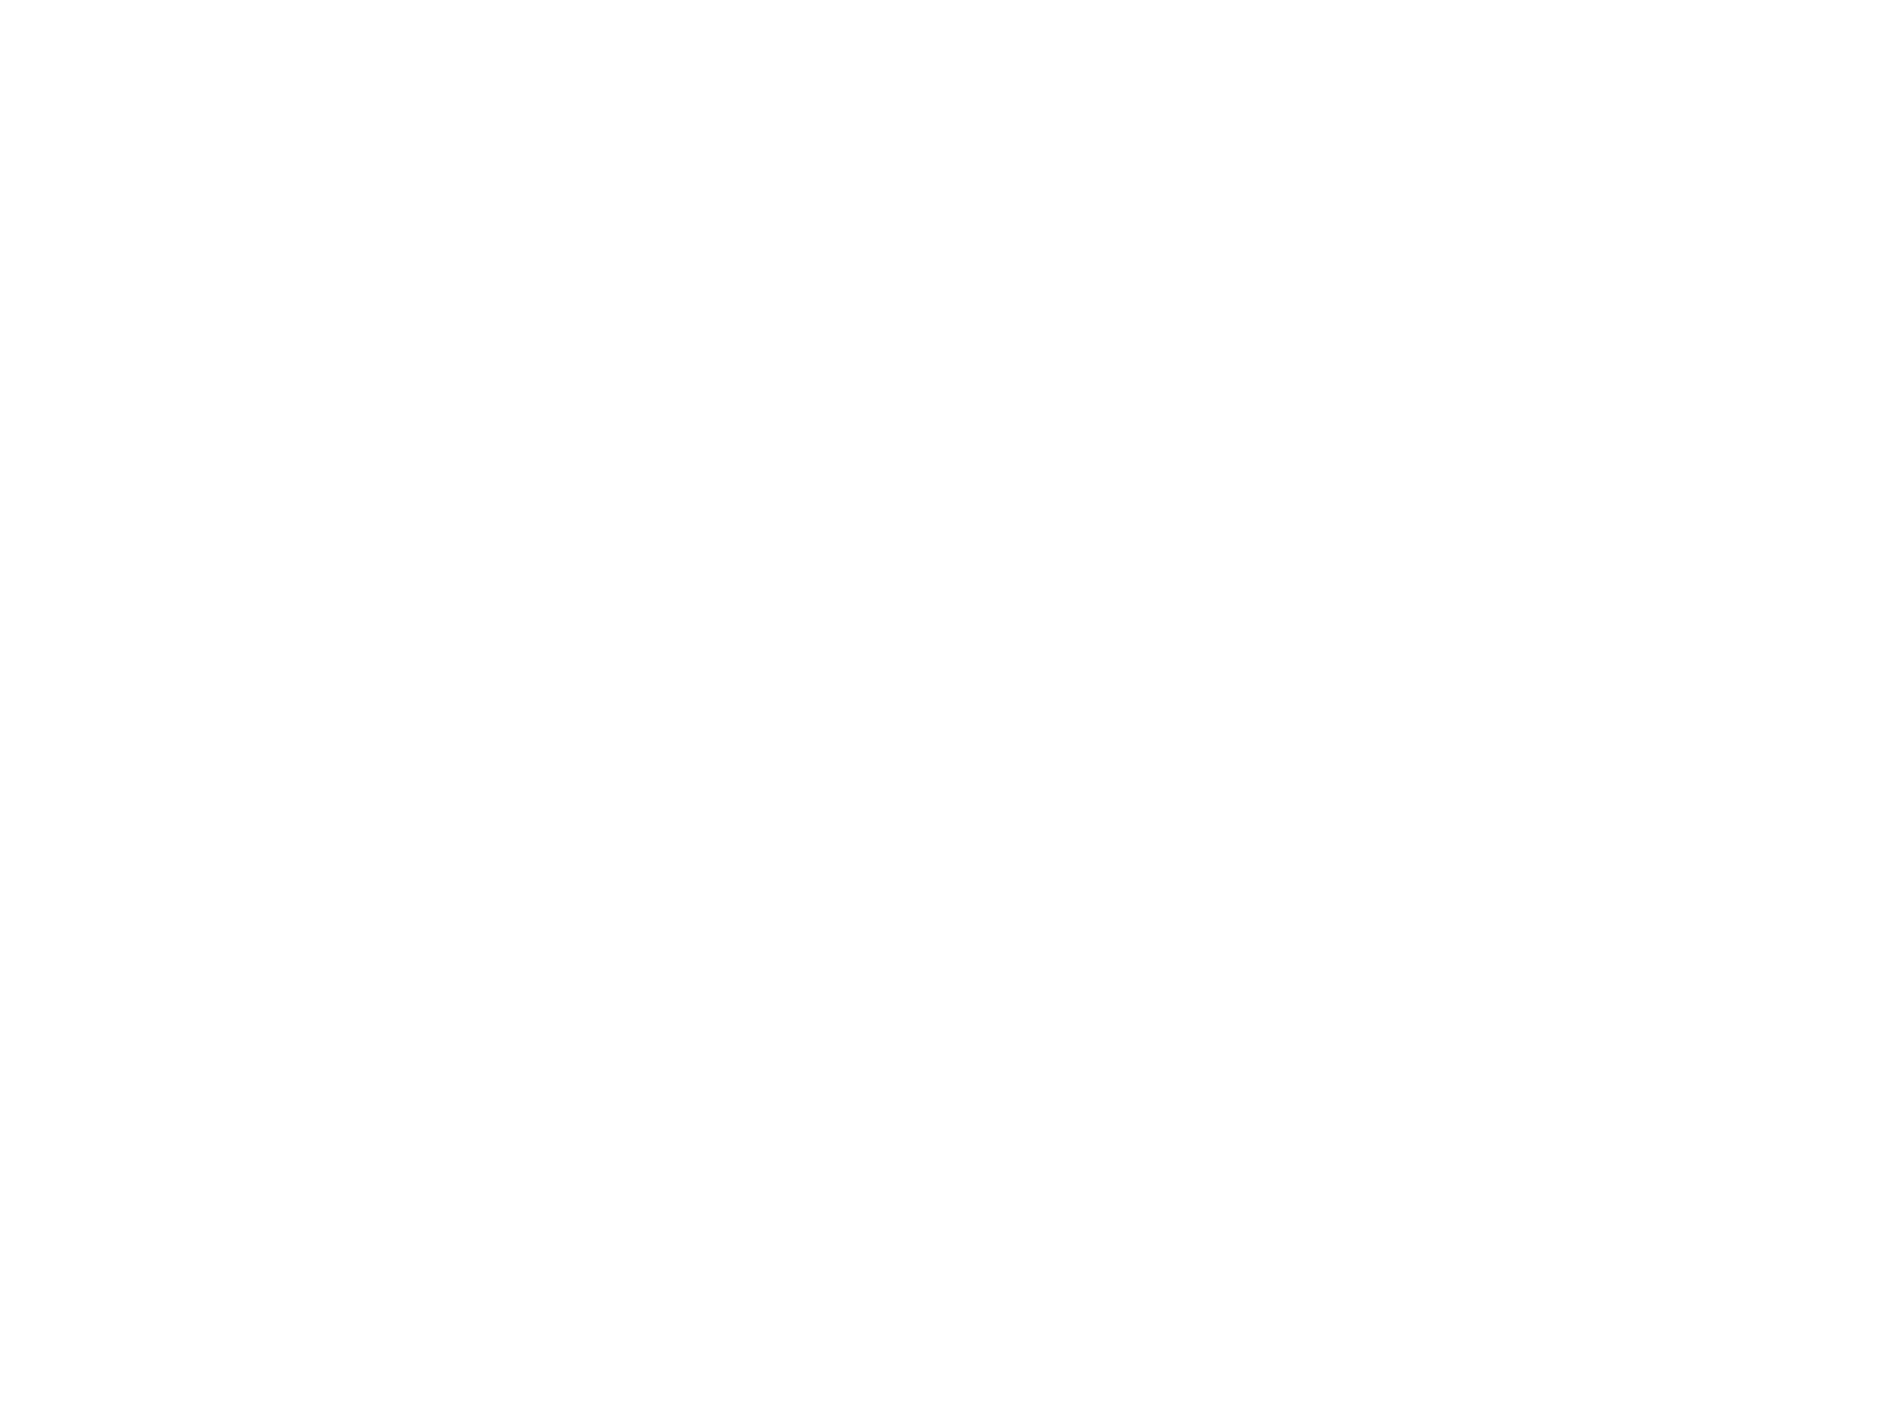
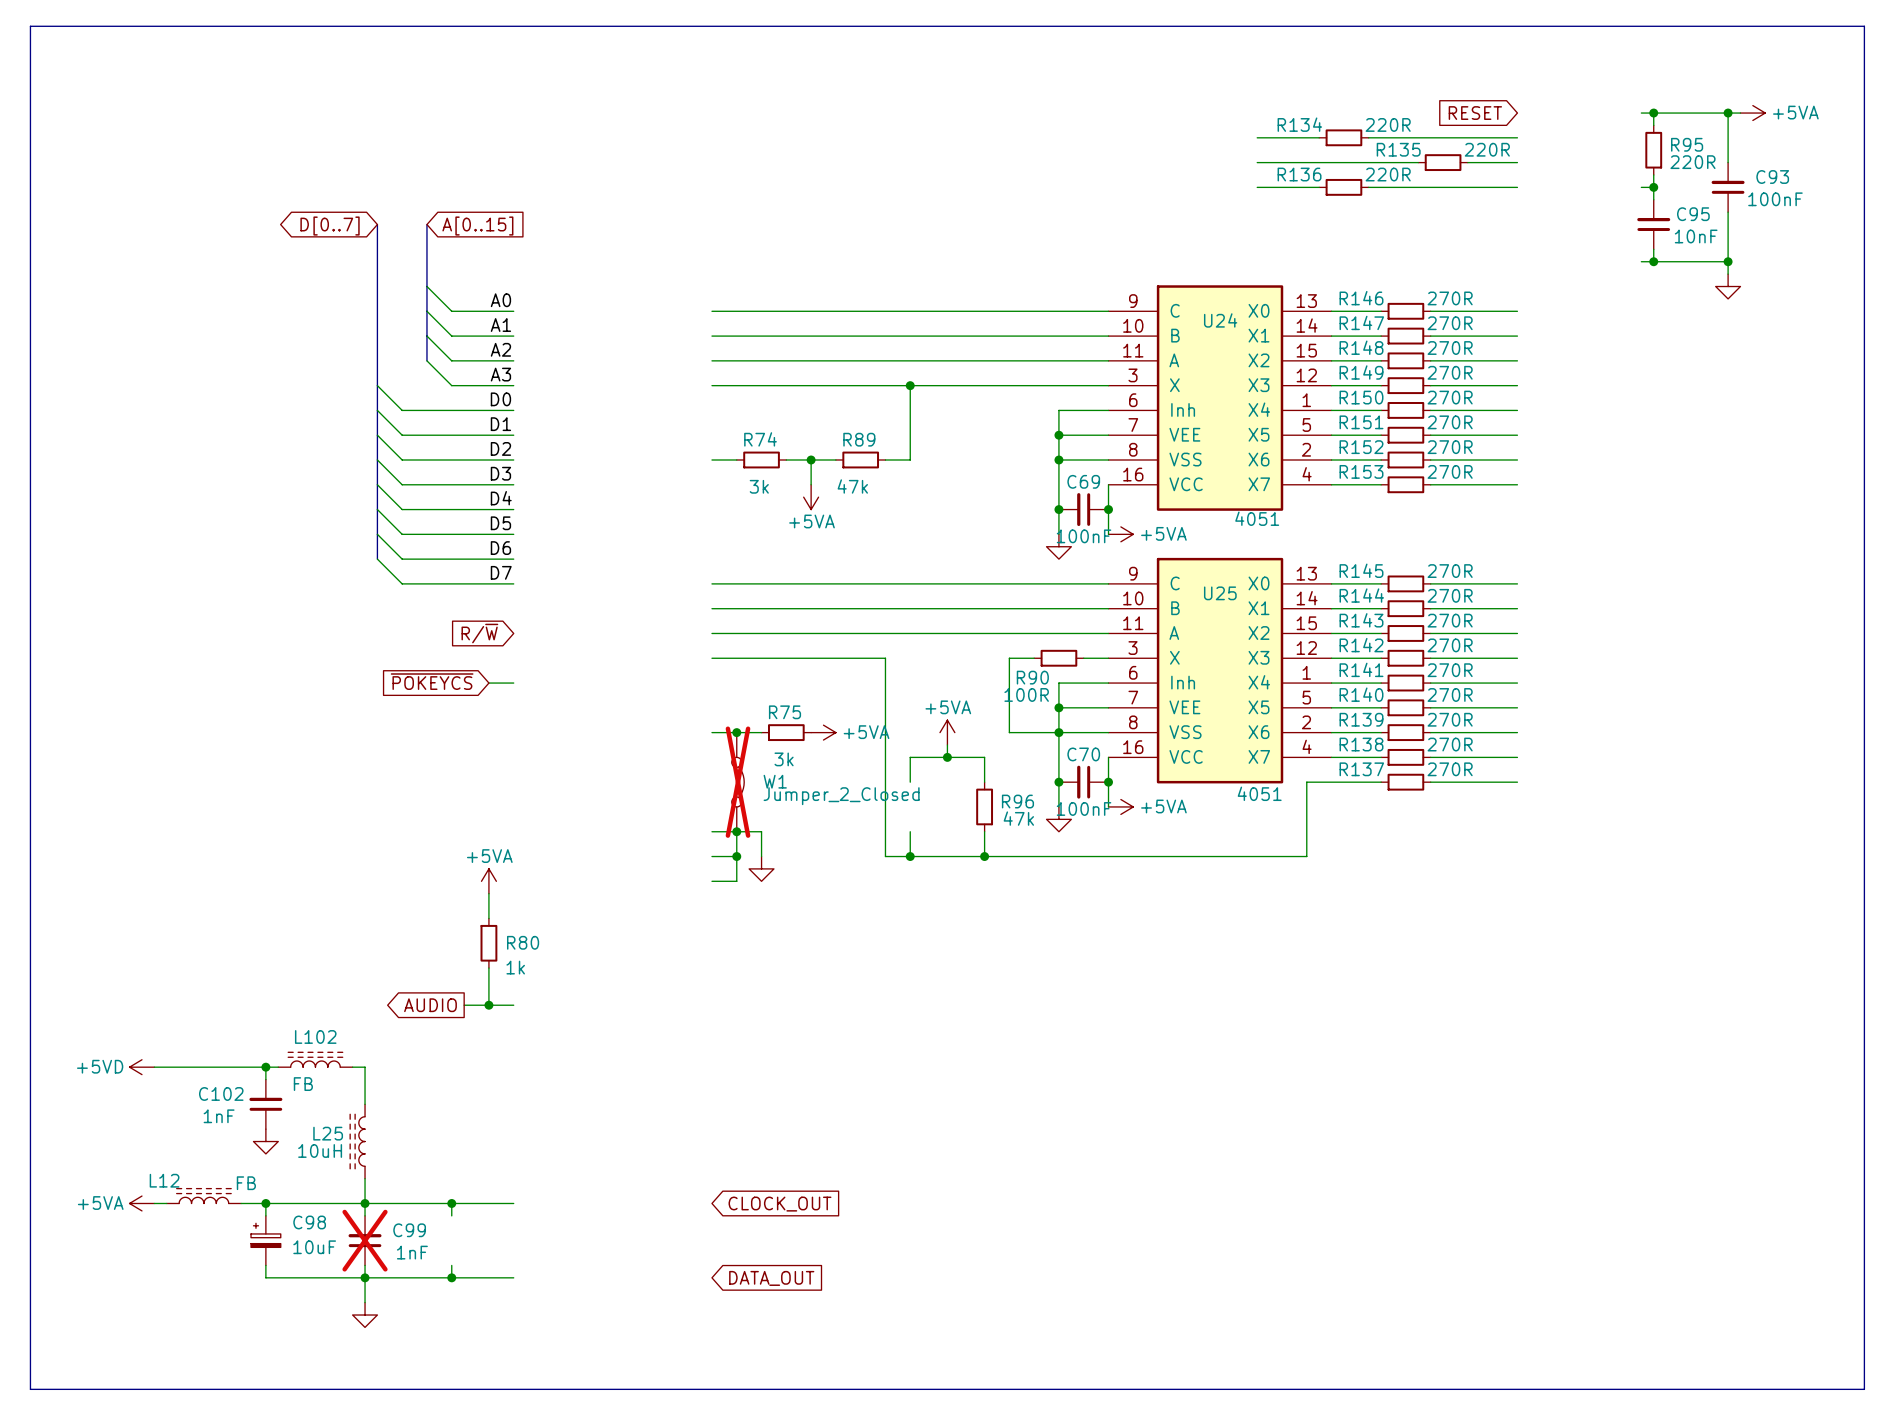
line: none -> (30, 26) (1864, 26) (1864, 1389) (30, 1389) (30, 26)
global label: none -> RESET (1475, 113)
wire: none -> (1641, 113) (1740, 113)
wire: none -> (1653, 113) (1653, 125)
junction: none -> (1653, 113)
wire: none -> (1728, 113) (1728, 162)
junction: none -> (1728, 113)
power symbol: none -> +5VA (1752, 113)
wire: none -> (1257, 137) (1319, 137)
R134: none -> 220R (1343, 137)
wire: none -> (1368, 137) (1517, 137)
R95: none -> 220R (1653, 150)
wire: none -> (1257, 162) (1418, 162)
R135: none -> 220R (1443, 162)
wire: none -> (1467, 162) (1517, 162)
wire: none -> (1653, 174) (1653, 199)
wire: none -> (1257, 187) (1319, 187)
R136: none -> 220R (1343, 187)
wire: none -> (1368, 187) (1517, 187)
wire: none -> (1641, 187) (1653, 187)
junction: none -> (1653, 187)
C93: none -> 100nF (1728, 187)
wire: none -> (1728, 212) (1728, 274)
bus: none -> (377, 224) (377, 559)
bus: none -> (426, 224) (426, 360)
C95: none -> 10nF (1653, 224)
global label: none -> D[0..7] (330, 226)
global label: none -> A[0..15] (477, 226)
wire: none -> (1653, 249) (1653, 261)
wire: none -> (1641, 261) (1728, 261)
junction: none -> (1653, 261)
junction: none -> (1728, 261)
wire: none -> (426, 286) (451, 311) (513, 311)
power symbol: none -> (1728, 286)
label: none -> A0 (500, 300)
wire: none -> (426, 311) (451, 336) (513, 336)
wire: none -> (711, 311) (1108, 311)
wire: none -> (1331, 311) (1381, 311)
R146: none -> 270R (1405, 311)
wire: none -> (1430, 311) (1517, 311)
label: none -> A1 (500, 325)
wire: none -> (426, 336) (451, 360) (513, 360)
wire: none -> (711, 336) (1108, 336)
wire: none -> (1331, 336) (1381, 336)
R147: none -> 270R (1405, 336)
wire: none -> (1430, 336) (1517, 336)
label: none -> A2 (500, 349)
wire: none -> (426, 360) (451, 385) (513, 385)
wire: none -> (711, 360) (1108, 360)
wire: none -> (1331, 360) (1381, 360)
R148: none -> 270R (1405, 360)
wire: none -> (1430, 360) (1517, 360)
label: none -> A3 (500, 374)
wire: none -> (377, 385) (402, 410) (513, 410)
wire: none -> (711, 385) (1108, 385)
wire: none -> (910, 385) (910, 459) (885, 459)
junction: none -> (910, 385)
wire: none -> (1331, 385) (1381, 385)
R149: none -> 270R (1405, 385)
wire: none -> (1430, 385) (1517, 385)
U24: none -> 4051 (1220, 398)
label: none -> D0 (500, 399)
wire: none -> (377, 410) (402, 435) (513, 435)
wire: none -> (1108, 410) (1058, 410) (1058, 534)
wire: none -> (1331, 410) (1381, 410)
R150: none -> 270R (1405, 410)
wire: none -> (1430, 410) (1517, 410)
label: none -> D1 (500, 424)
wire: none -> (377, 435) (402, 459) (513, 459)
wire: none -> (1058, 435) (1108, 435)
junction: none -> (1058, 435)
wire: none -> (1331, 435) (1381, 435)
R151: none -> 270R (1405, 435)
wire: none -> (1430, 435) (1517, 435)
label: none -> D2 (500, 448)
wire: none -> (377, 459) (402, 484) (513, 484)
wire: none -> (711, 459) (736, 459)
R74: none -> 3k (761, 459)
wire: none -> (786, 459) (835, 459)
wire: none -> (811, 459) (811, 484)
junction: none -> (811, 459)
R89: none -> 47k (860, 459)
wire: none -> (1058, 459) (1108, 459)
junction: none -> (1058, 459)
wire: none -> (1331, 459) (1381, 459)
R152: none -> 270R (1405, 459)
wire: none -> (1430, 459) (1517, 459)
label: none -> D3 (500, 473)
wire: none -> (377, 484) (402, 509) (513, 509)
wire: none -> (1108, 484) (1108, 534)
wire: none -> (1331, 484) (1381, 484)
R153: none -> 270R (1405, 484)
wire: none -> (1430, 484) (1517, 484)
power symbol: none -> +5VA (811, 497)
label: none -> D4 (501, 498)
wire: none -> (377, 509) (402, 534) (513, 534)
junction: none -> (1058, 509)
C69: none -> 100nF (1083, 509)
junction: none -> (1108, 509)
label: none -> D5 (500, 523)
wire: none -> (377, 534) (402, 559) (513, 559)
power symbol: none -> +5VA (1120, 534)
power symbol: none -> (1058, 546)
label: none -> D6 (500, 548)
wire: none -> (377, 559) (402, 583) (513, 583)
label: none -> D7 (501, 572)
wire: none -> (711, 583) (1108, 583)
wire: none -> (1331, 583) (1381, 583)
R145: none -> 270R (1405, 583)
wire: none -> (1430, 583) (1517, 583)
wire: none -> (711, 608) (1108, 608)
wire: none -> (1331, 608) (1381, 608)
R144: none -> 270R (1405, 608)
wire: none -> (1430, 608) (1517, 608)
global label: none -> R/~{W} (479, 633)
wire: none -> (711, 633) (1108, 633)
wire: none -> (1331, 633) (1381, 633)
R143: none -> 270R (1405, 633)
wire: none -> (1430, 633) (1517, 633)
wire: none -> (711, 658) (885, 658) (885, 856) (1306, 856) (1306, 782) (1381, 782)
wire: none -> (1034, 658) (1009, 658) (1009, 732) (1108, 732)
R90: none -> 100R (1058, 658)
wire: none -> (1083, 658) (1108, 658)
wire: none -> (1331, 658) (1381, 658)
R142: none -> 270R (1405, 658)
wire: none -> (1430, 658) (1517, 658)
U25: none -> 4051 (1220, 670)
global label: none -> ~{POKEYCS} (432, 681)
wire: none -> (488, 683) (513, 683)
wire: none -> (1108, 683) (1058, 683) (1058, 806)
wire: none -> (1331, 683) (1381, 683)
R141: none -> 270R (1405, 683)
wire: none -> (1430, 683) (1517, 683)
wire: none -> (1058, 707) (1108, 707)
junction: none -> (1058, 707)
wire: none -> (1331, 707) (1381, 707)
R140: none -> 270R (1405, 707)
wire: none -> (1430, 707) (1517, 707)
wire: none -> (711, 732) (761, 732)
junction: none -> (736, 732)
R75: none -> 3k (786, 732)
power symbol: none -> +5VA (823, 732)
power symbol: none -> +5VA (947, 732)
junction: none -> (1058, 732)
wire: none -> (1331, 732) (1381, 732)
R139: none -> 270R (1405, 732)
wire: none -> (1430, 732) (1517, 732)
wire: none -> (947, 745) (947, 757)
junction: none -> (947, 757)
wire: none -> (1108, 757) (1108, 806)
wire: none -> (1331, 757) (1381, 757)
R138: none -> 270R (1405, 757)
wire: none -> (1430, 757) (1517, 757)
W1: none -> Jumper_2_Closed (738, 782)
wire: none -> (910, 782) (910, 757) (984, 757) (984, 782)
junction: none -> (1058, 782)
C70: none -> 100nF (1083, 782)
junction: none -> (1108, 782)
R137: none -> 270R (1405, 782)
wire: none -> (1430, 782) (1517, 782)
R96: none -> 47k (984, 806)
power symbol: none -> +5VA (1120, 806)
power symbol: none -> (1058, 819)
wire: none -> (711, 831) (761, 831) (761, 856)
wire: none -> (736, 831) (736, 881) (711, 881)
junction: none -> (736, 831)
wire: none -> (910, 831) (910, 856)
wire: none -> (984, 831) (984, 856)
wire: none -> (711, 856) (736, 856)
junction: none -> (736, 856)
junction: none -> (910, 856)
junction: none -> (984, 856)
power symbol: none -> (761, 868)
power symbol: none -> +5VA (488, 881)
wire: none -> (488, 893) (488, 918)
R80: none -> 1k (488, 943)
wire: none -> (488, 968) (488, 1005)
global label: none -> AUDIO (430, 1005)
wire: none -> (464, 1005) (513, 1005)
junction: none -> (488, 1005)
L102: none -> FB (315, 1059)
power symbol: none -> +5VD (141, 1067)
wire: none -> (154, 1067) (278, 1067)
wire: none -> (265, 1067) (265, 1079)
junction: none -> (265, 1067)
wire: none -> (352, 1067) (365, 1067) (365, 1104)
C102: none -> 1nF (265, 1104)
power symbol: none -> (265, 1141)
L25: none -> 10uH (357, 1141)
wire: none -> (365, 1178) (365, 1215)
L12: none -> FB (203, 1196)
power symbol: none -> +5VA (141, 1203)
wire: none -> (154, 1203) (166, 1203)
wire: none -> (241, 1203) (513, 1203)
wire: none -> (265, 1203) (265, 1215)
junction: none -> (265, 1203)
junction: none -> (365, 1203)
wire: none -> (451, 1203) (451, 1215)
junction: none -> (451, 1203)
global label: none -> CLOCK_OUT (780, 1204)
C98: none -> 10uF (265, 1240)
C99: none -> 1nF (365, 1240)
wire: none -> (265, 1265) (265, 1277) (513, 1277)
wire: none -> (365, 1265) (365, 1302)
wire: none -> (451, 1265) (451, 1277)
junction: none -> (365, 1277)
junction: none -> (451, 1277)
global label: none -> DATA_OUT (771, 1278)
power symbol: none -> (365, 1315)

